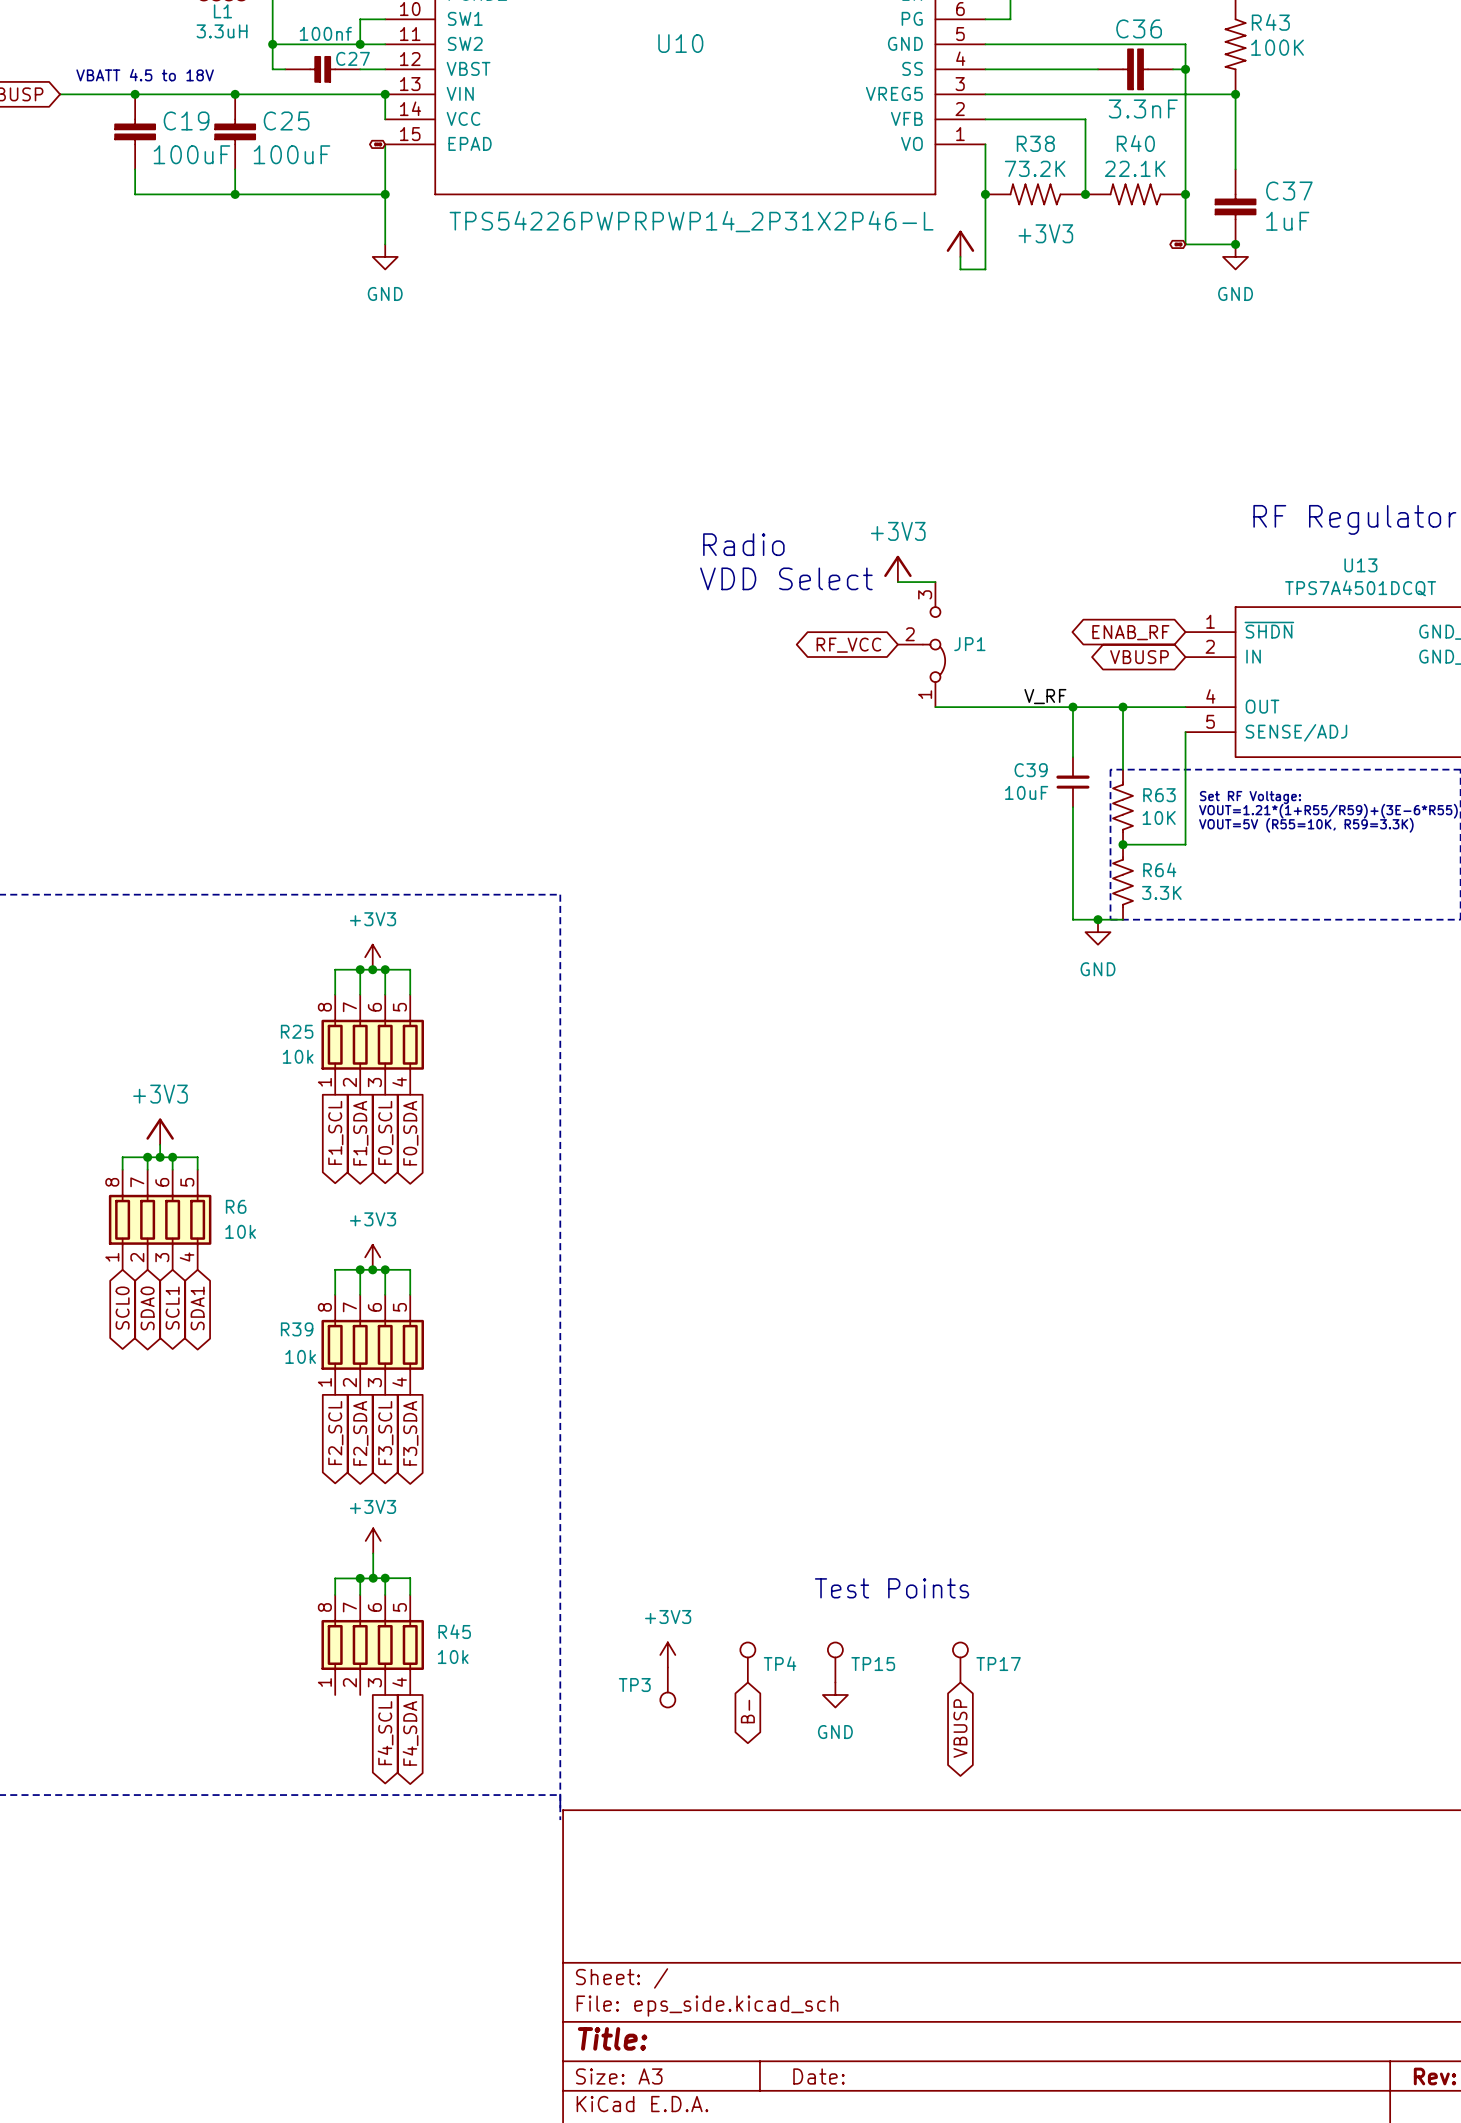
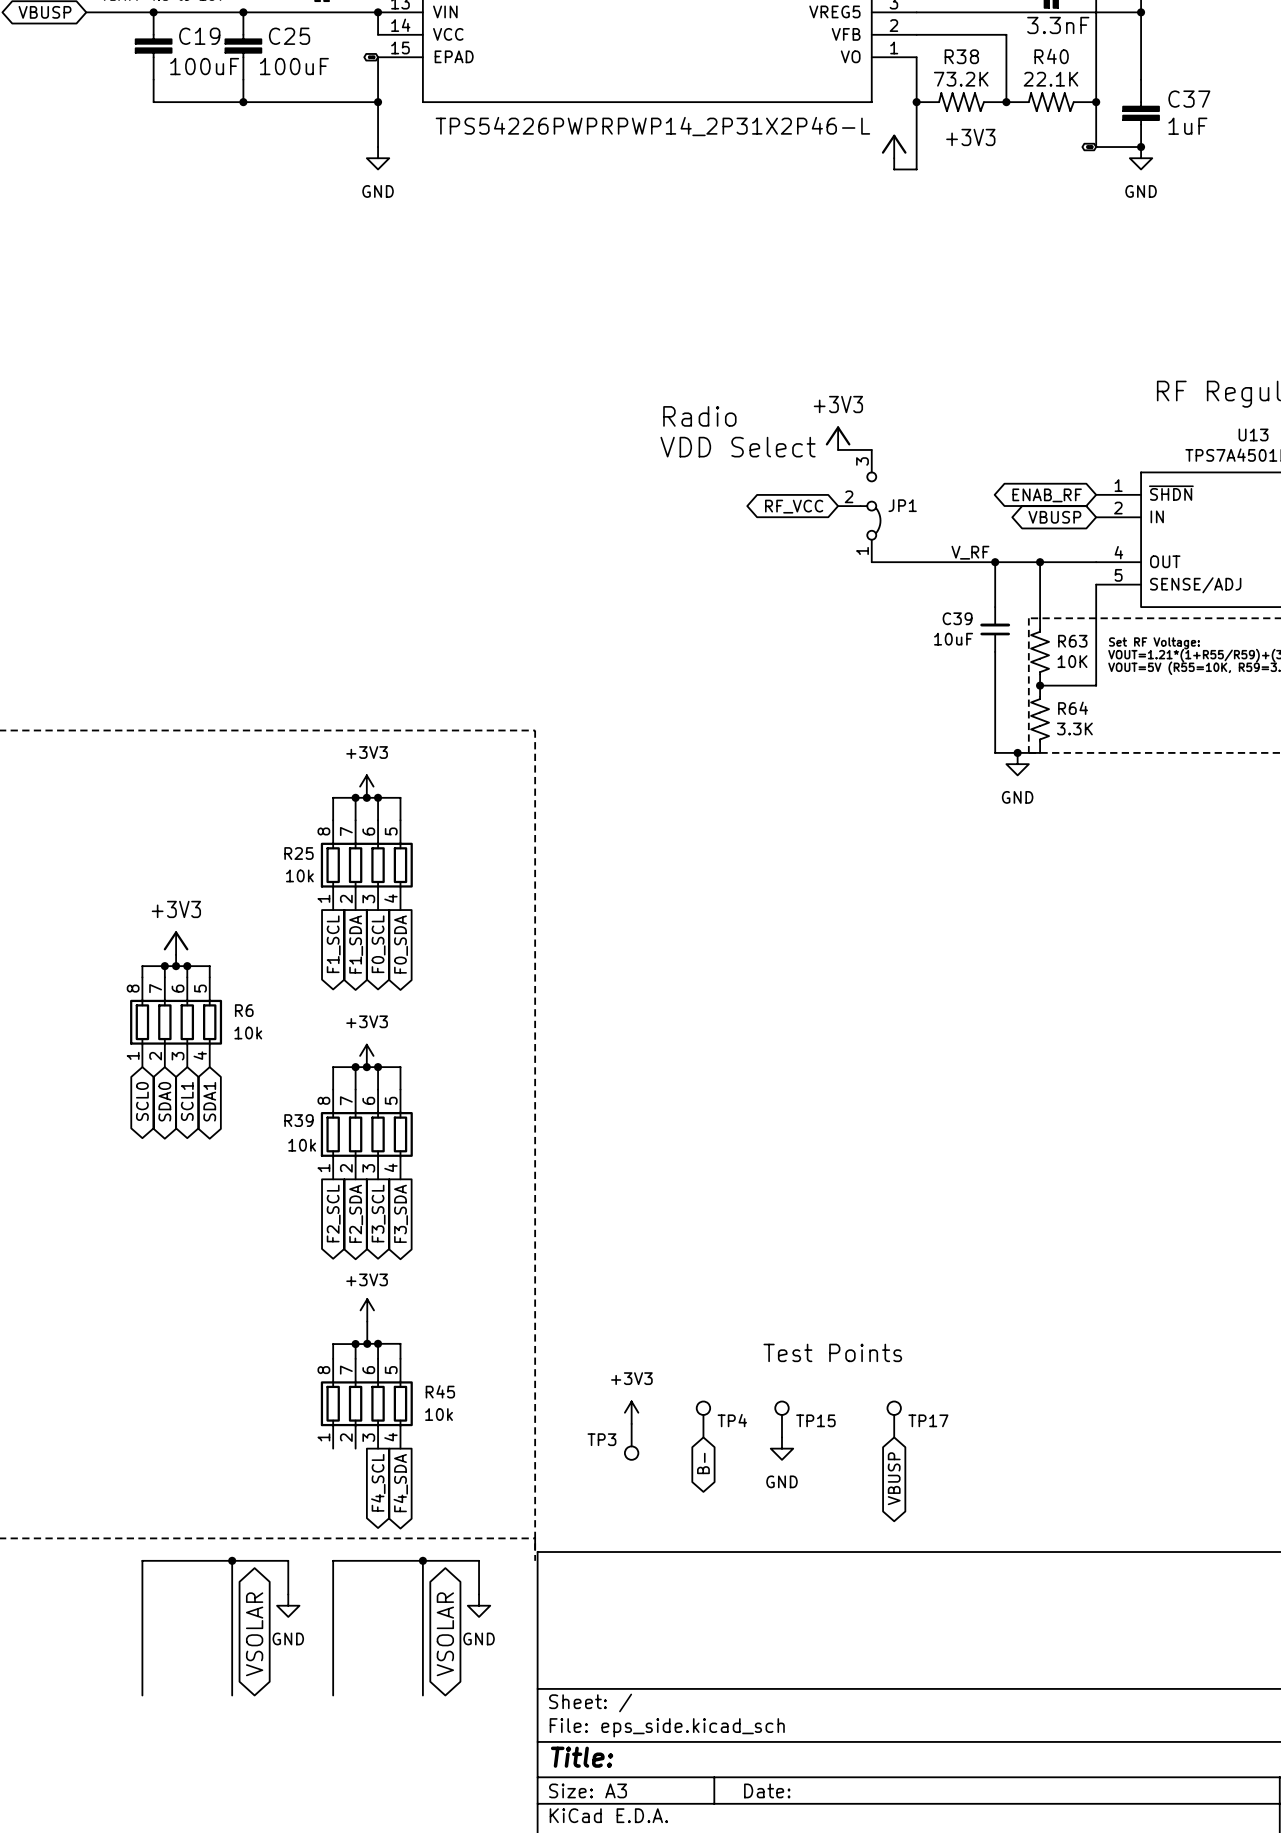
wire: none -> (232, 1560) (232, 1695)
junction: none -> (232, 1560)
wire: none -> (422, 1560) (422, 1695)
junction: none -> (422, 1560)
wire: none -> (288, 1594) (288, 1560) (142, 1560) (142, 1695)
wire: none -> (479, 1594) (479, 1560) (333, 1560) (333, 1695)
power symbol: none -> GND (288, 1605)
power symbol: none -> GND (479, 1605)
global label: none -> VSOLAR (254, 1634)
global label: none -> VSOLAR (445, 1634)

